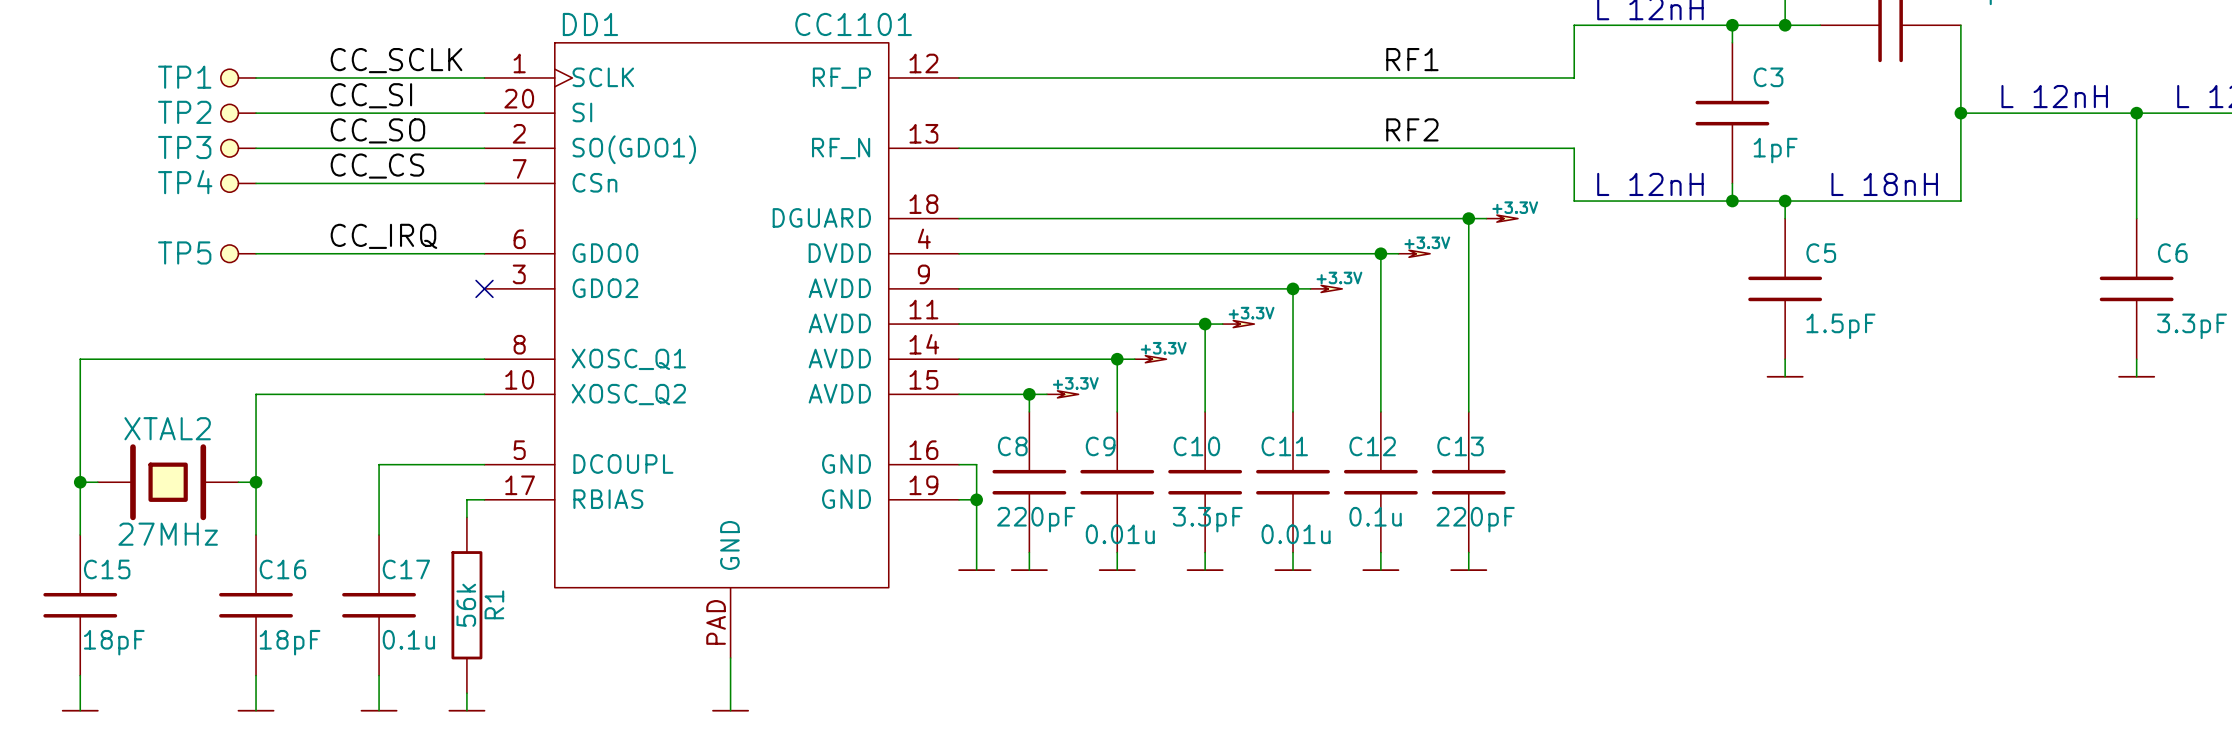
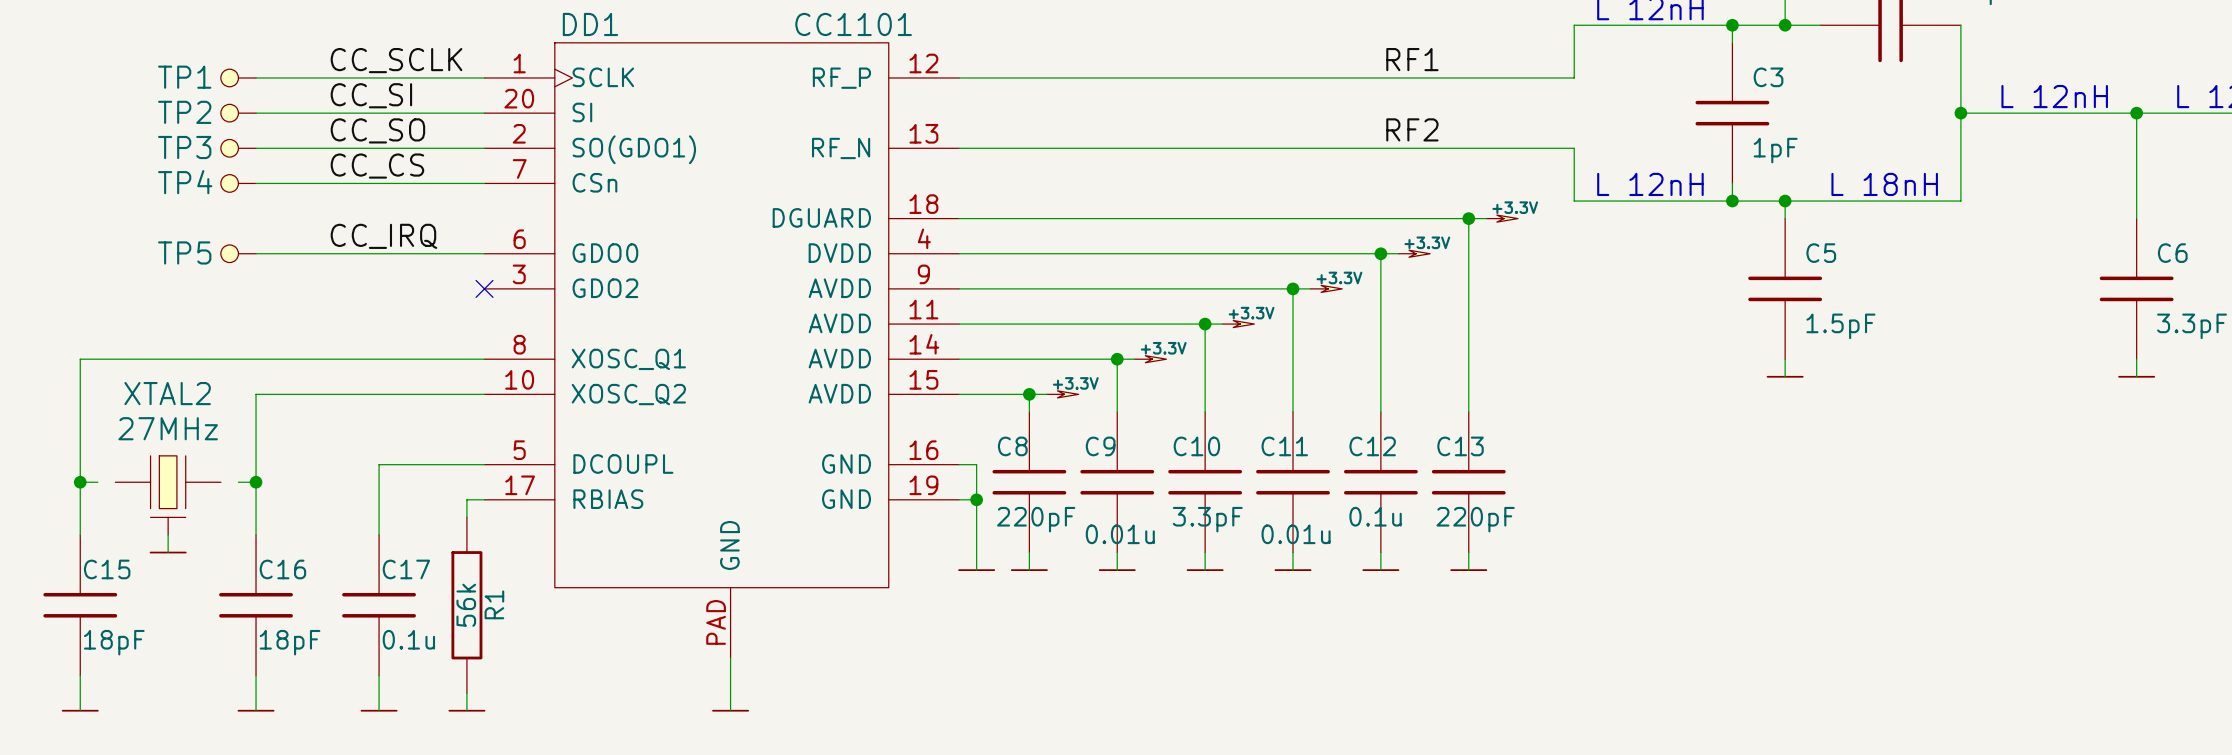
XTAL2 name position: XTAL2 (167, 428) -> XTAL2 (167, 393)
XTAL2 symbol: [97, 444, 239, 521] -> [115, 455, 221, 535]
wire: none -> (168, 534) (168, 552)
XTAL2 value position: 27MHz (168, 534) -> 27MHz (168, 428)
power symbol: none -> (168, 552)

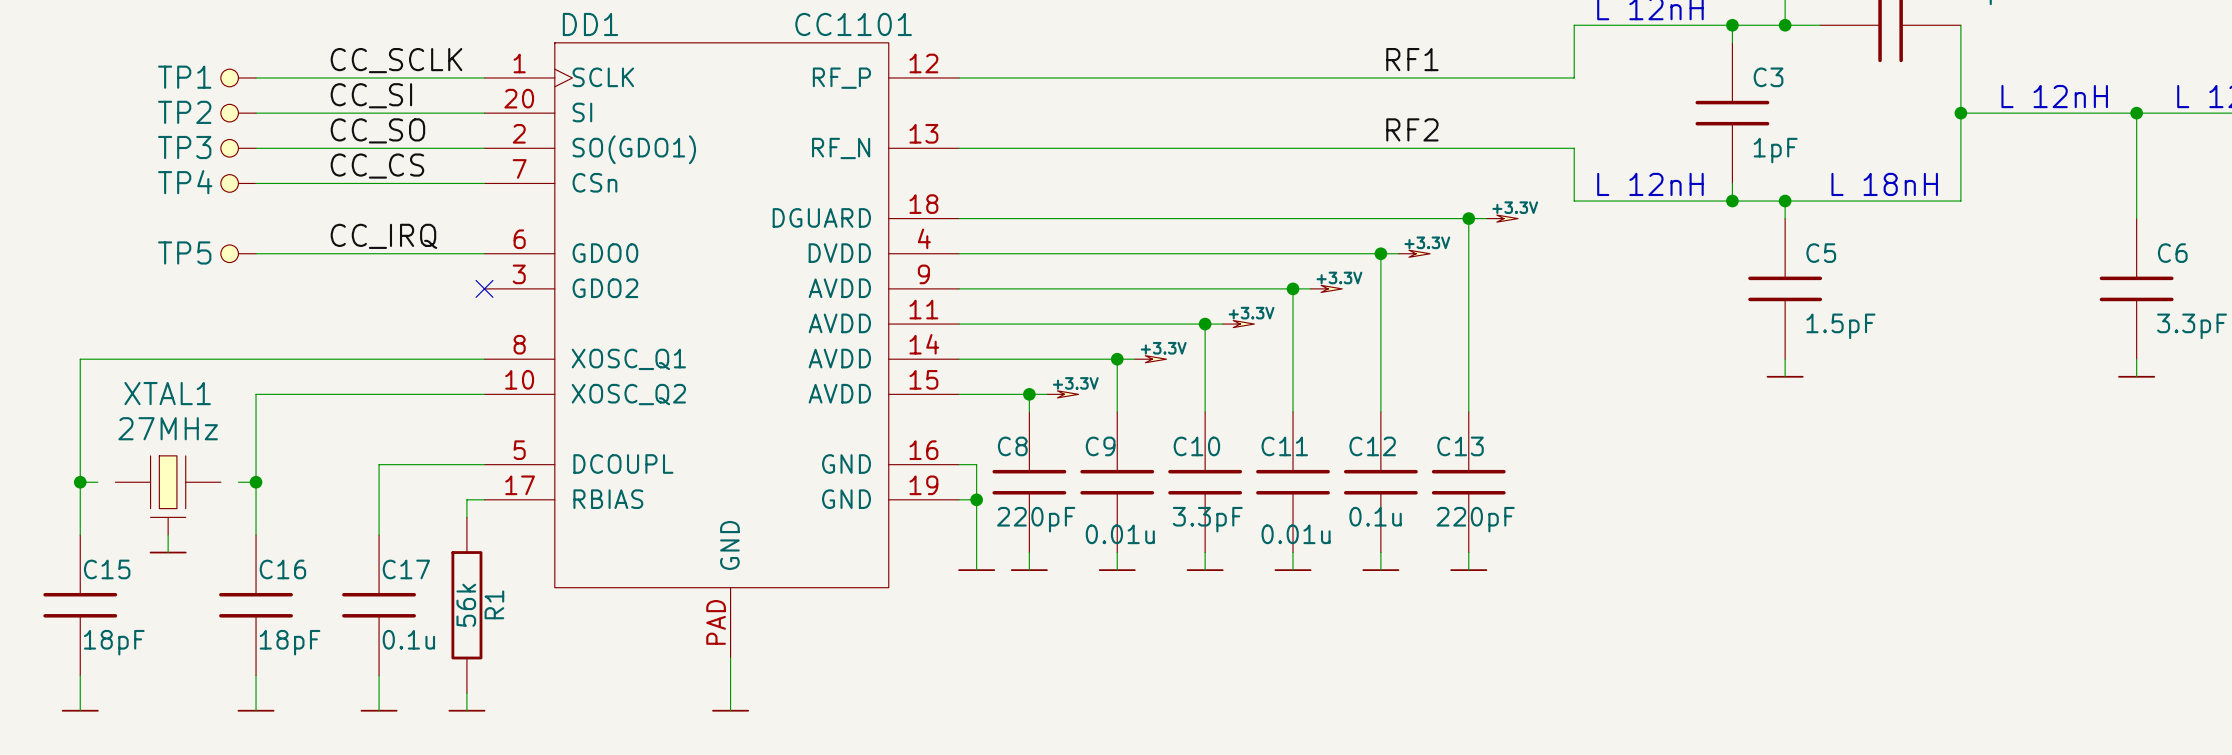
XTAL2 name: XTAL2 (167, 393) -> XTAL1 (167, 393)

